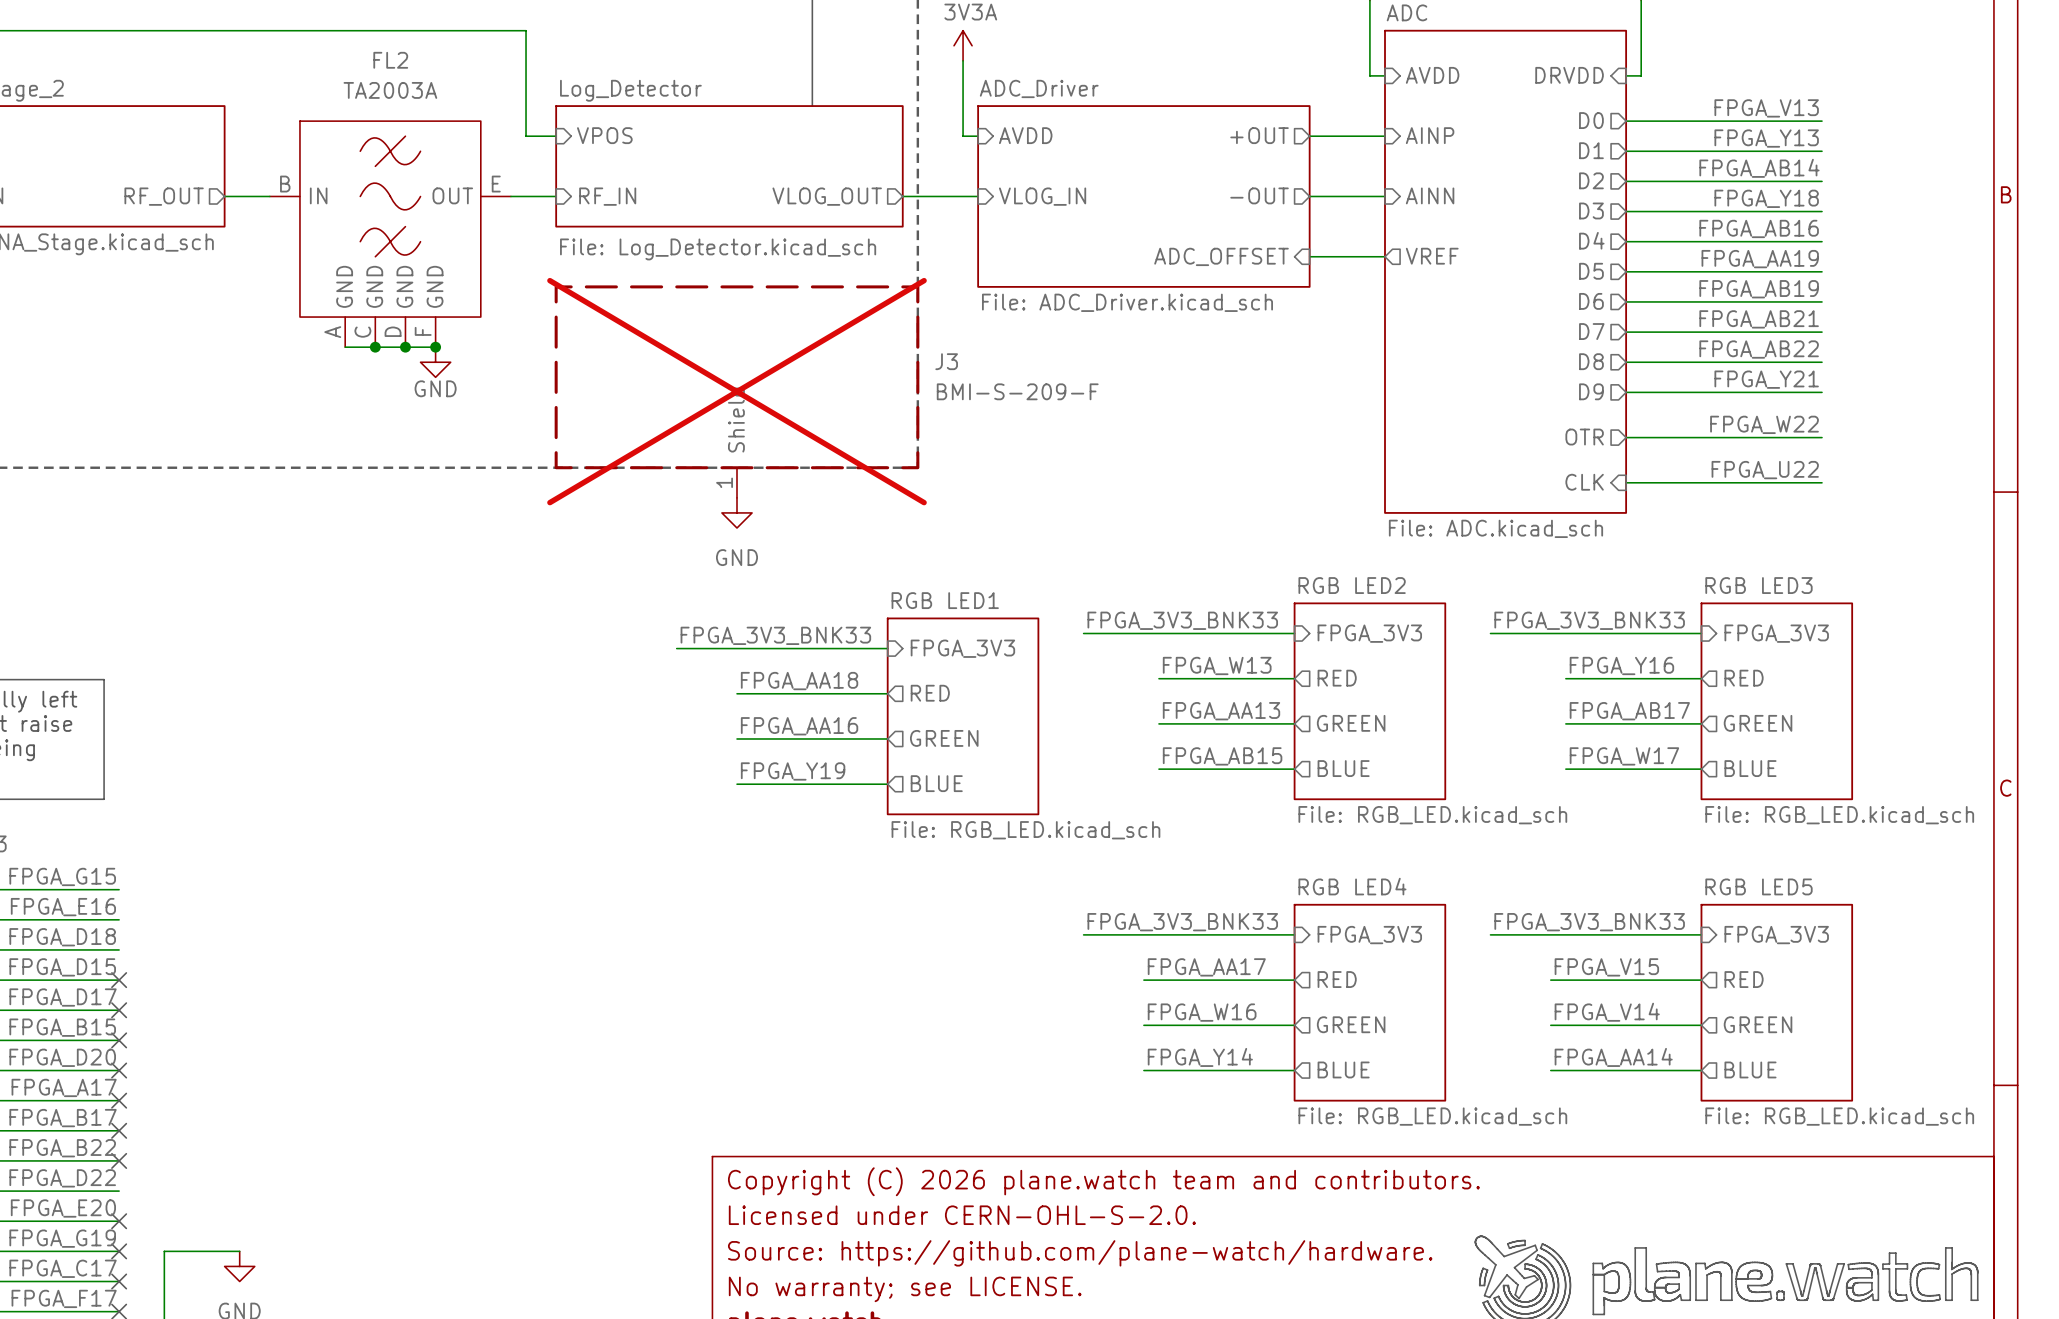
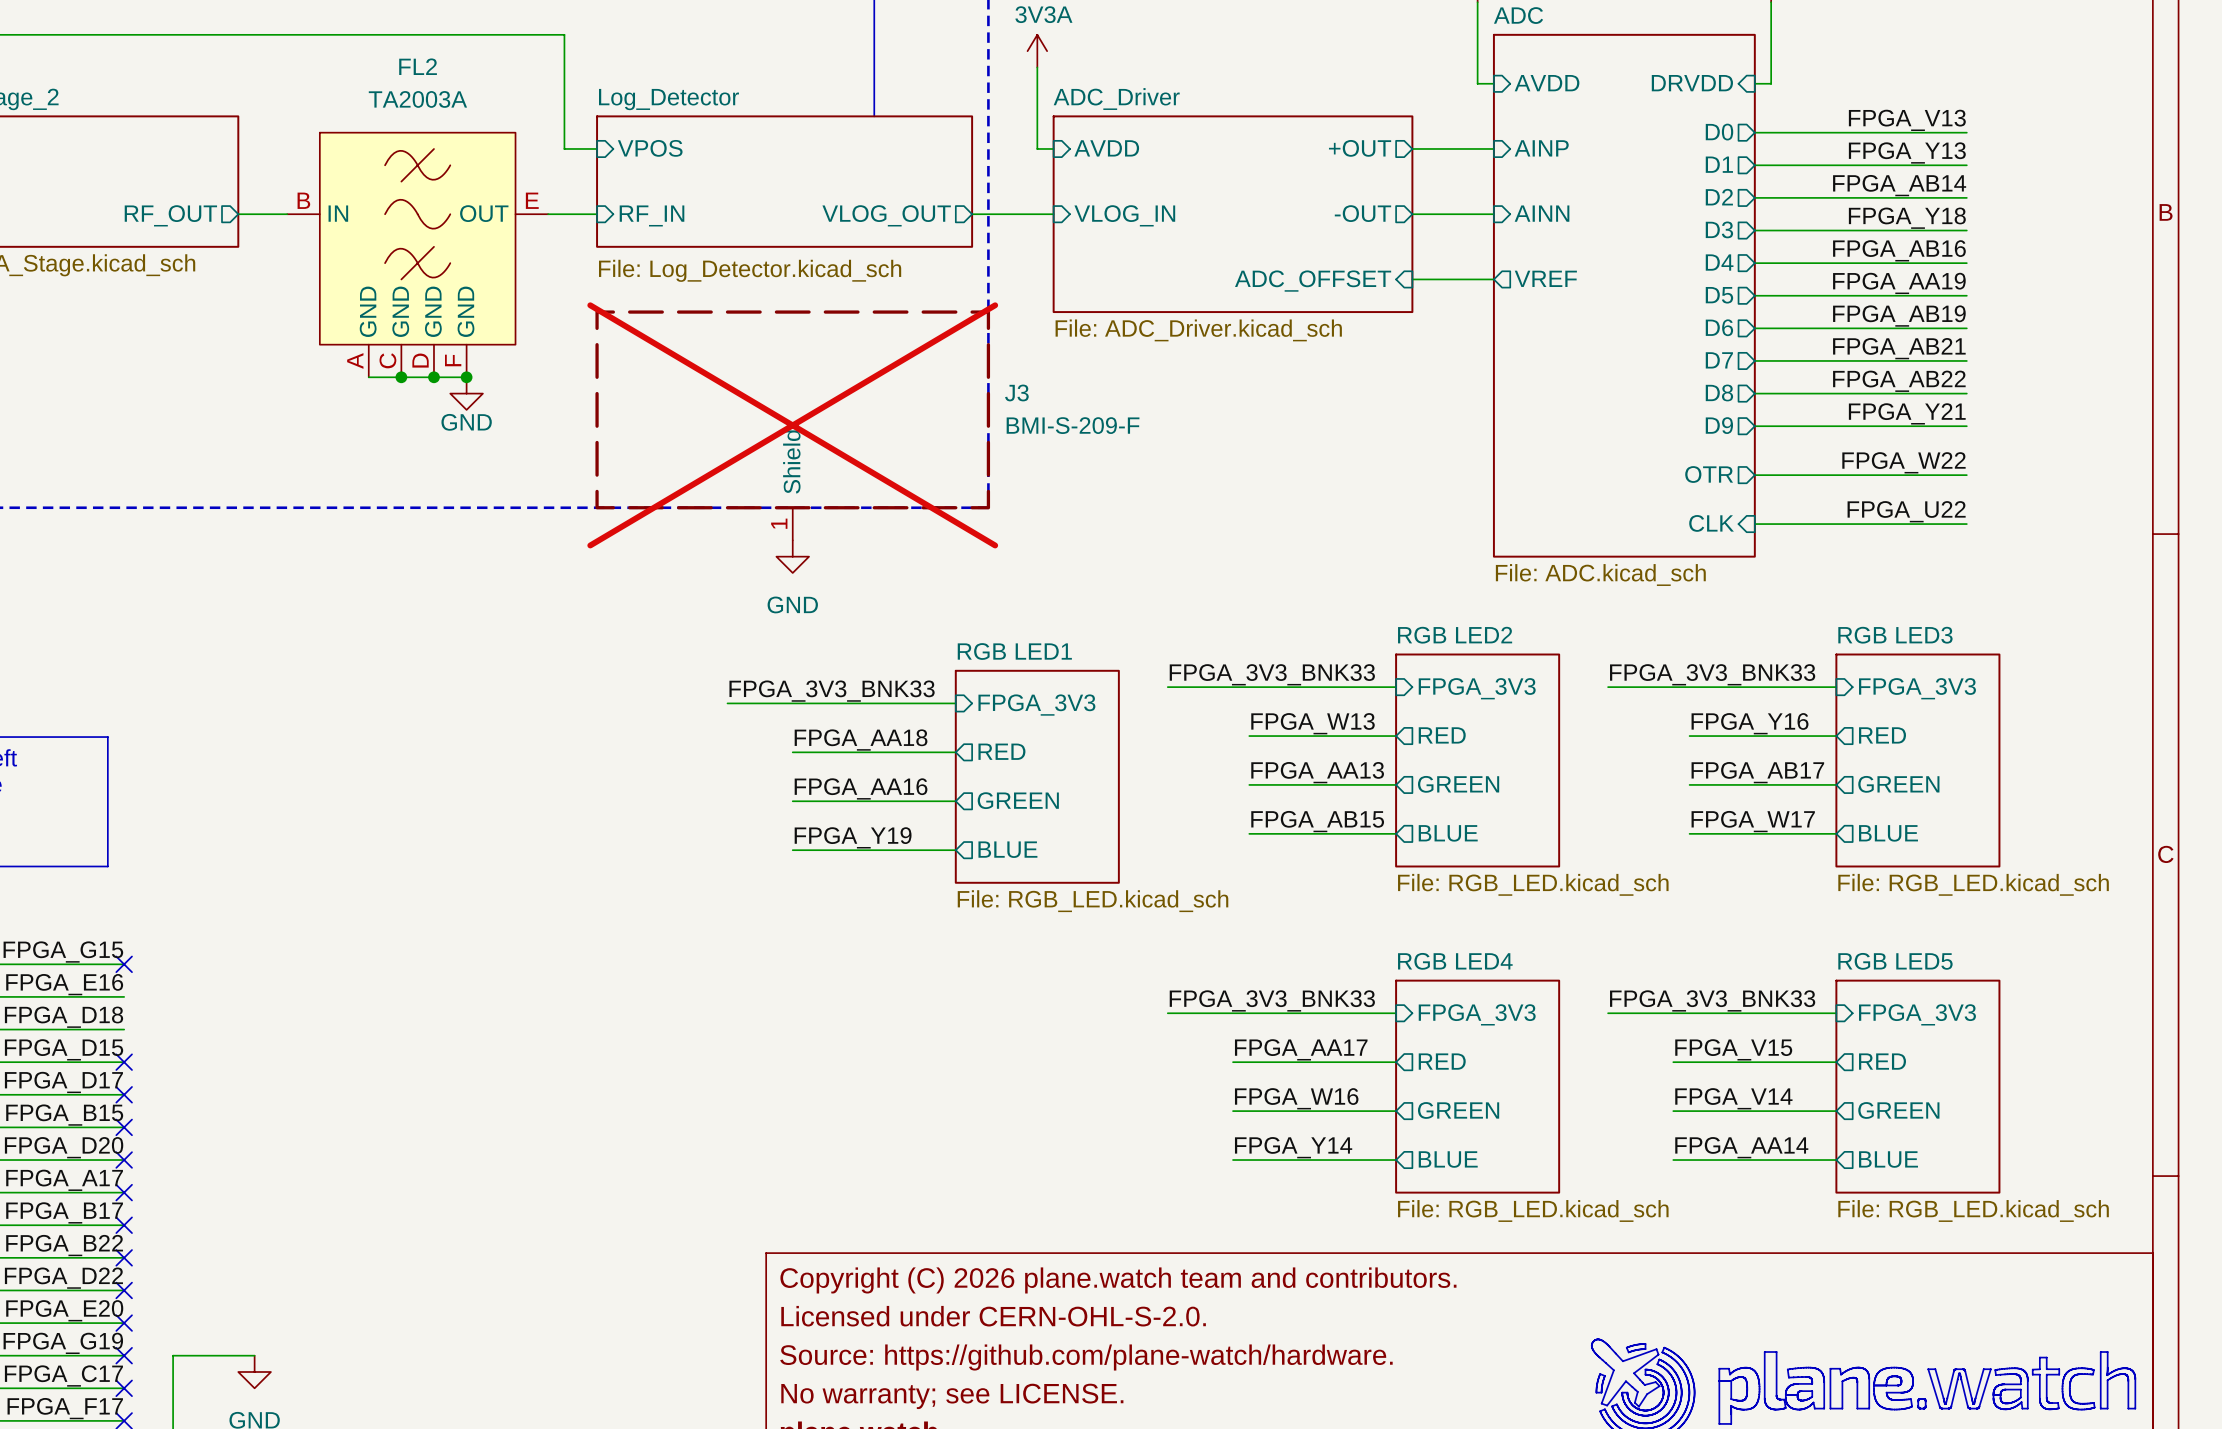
no-connect mark: none -> (124, 964)
no-connect mark: none -> (124, 1290)

